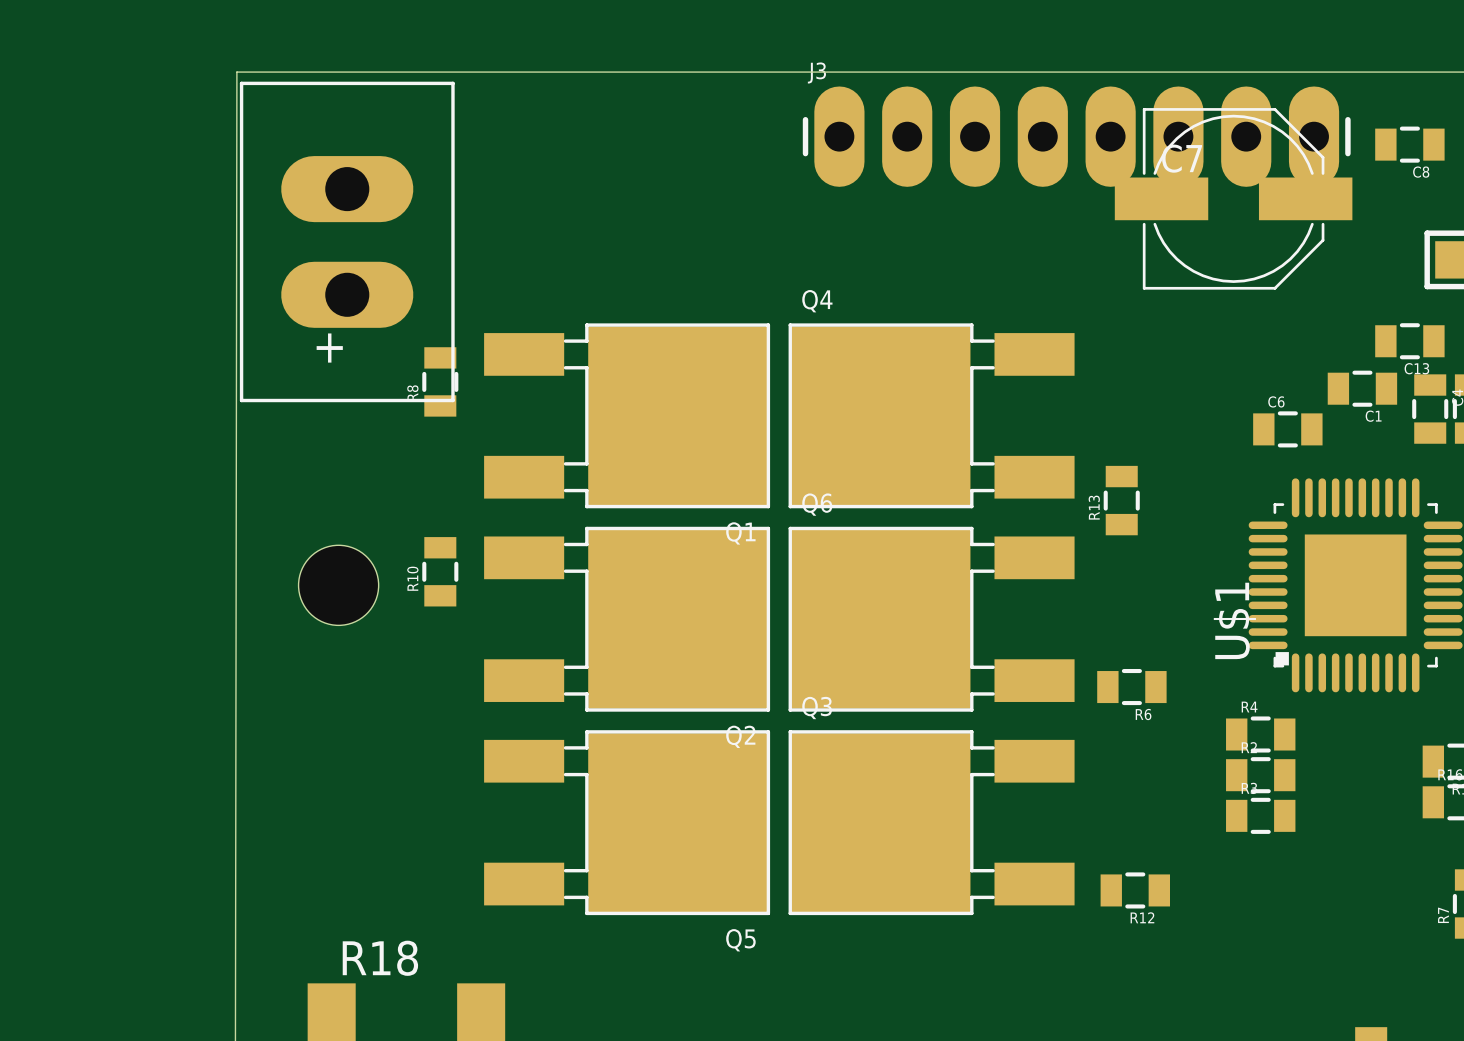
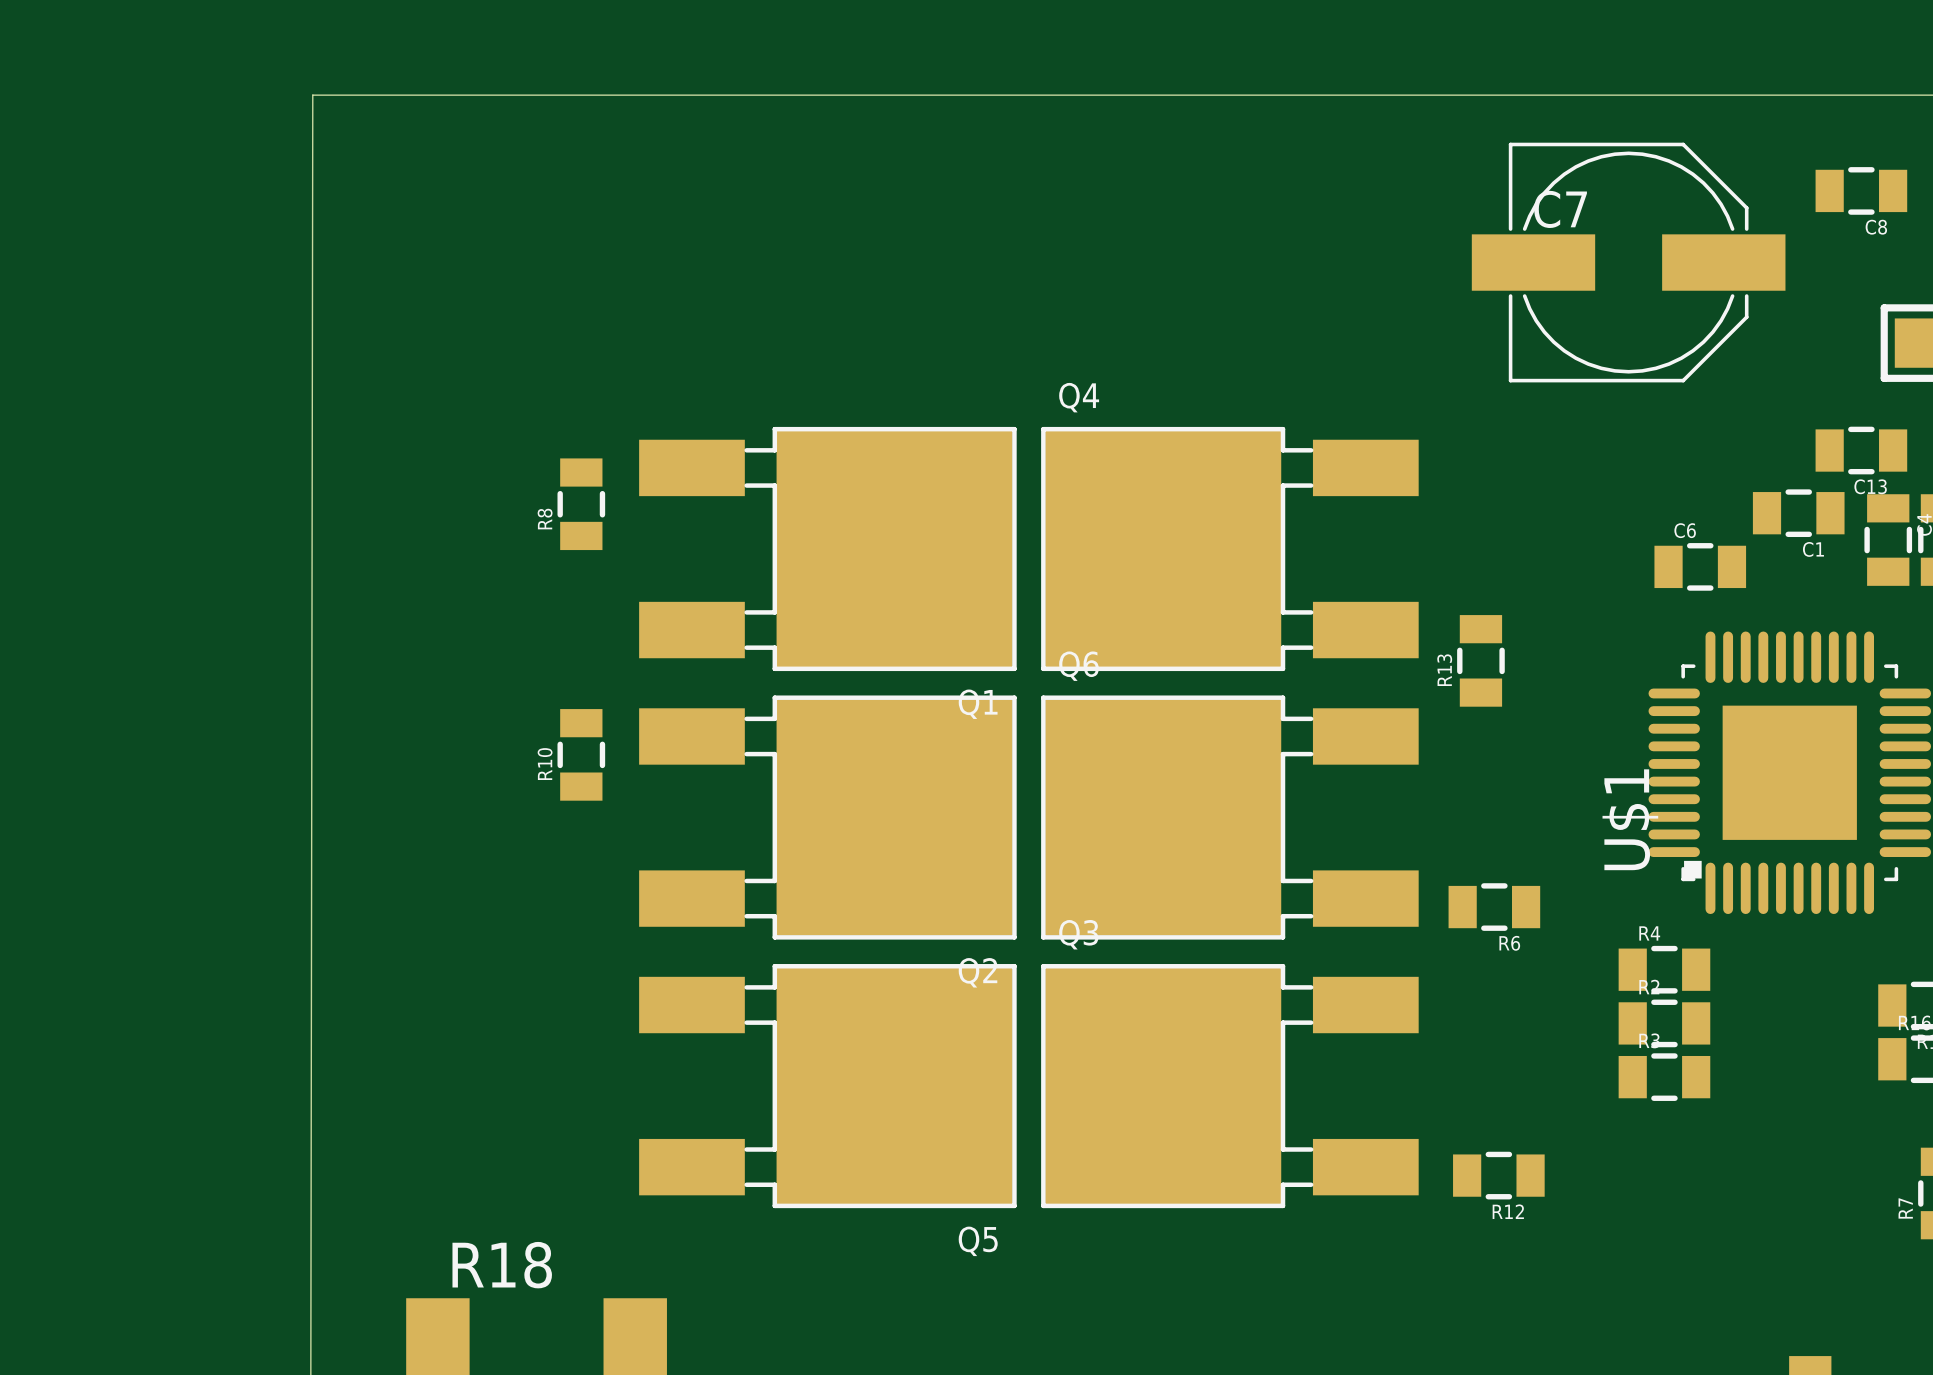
J3: (1076, 136) -> none
part: (347, 241) -> none
hole: (338, 585) -> none

